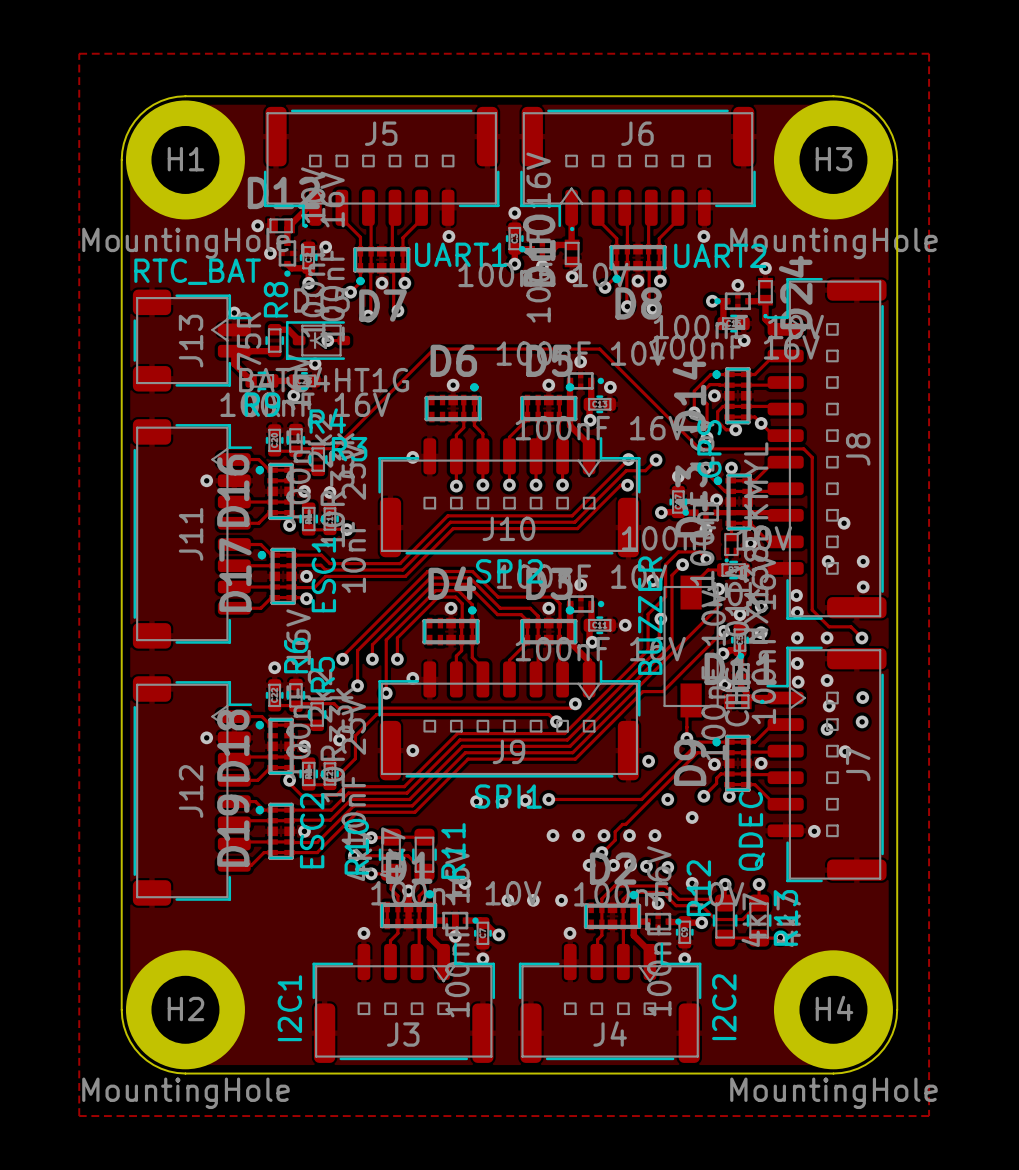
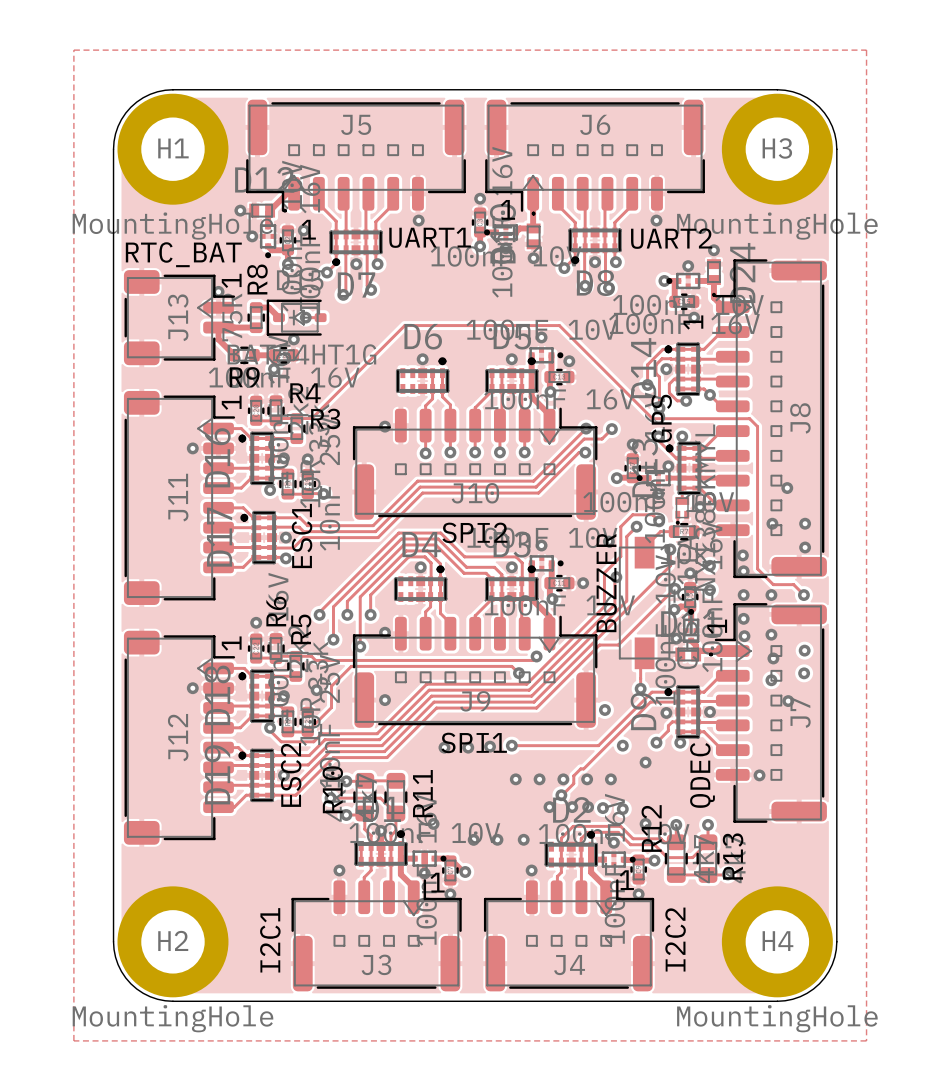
text: none -> 1 (507, 209)
text: none -> 1 (308, 229)
text: none -> 1 (231, 280)
text: none -> 1 (693, 322)
text: none -> 1 (231, 402)
text: none -> 1 (717, 626)
text: none -> 1 (231, 643)
text: none -> 1 (626, 880)
text: none -> 1 (437, 882)

